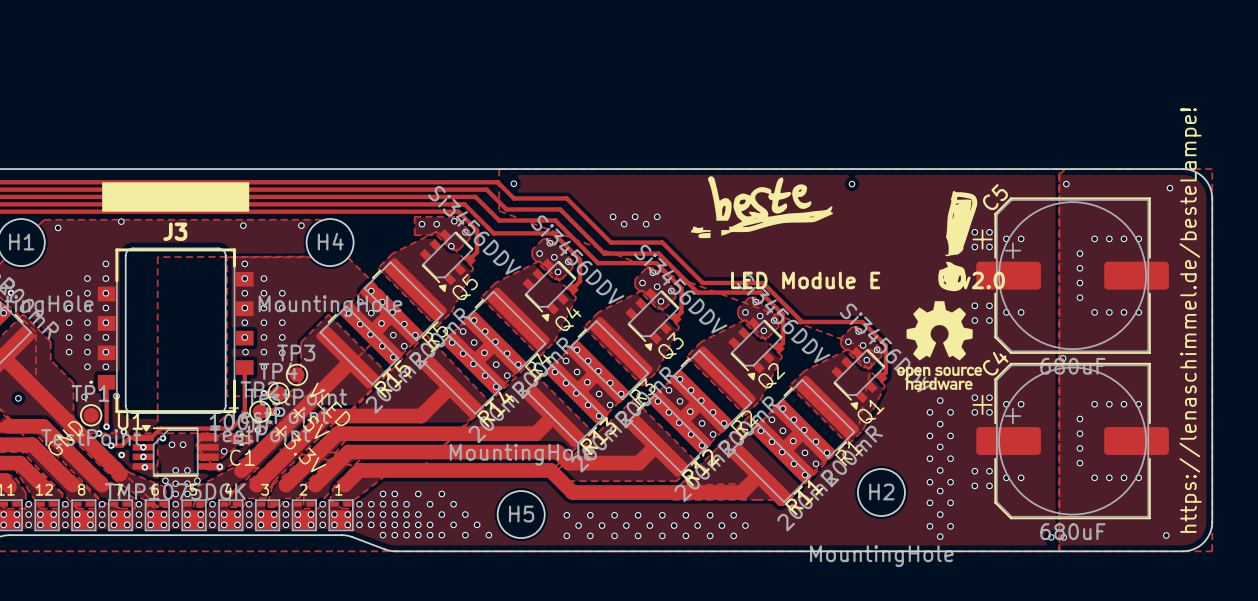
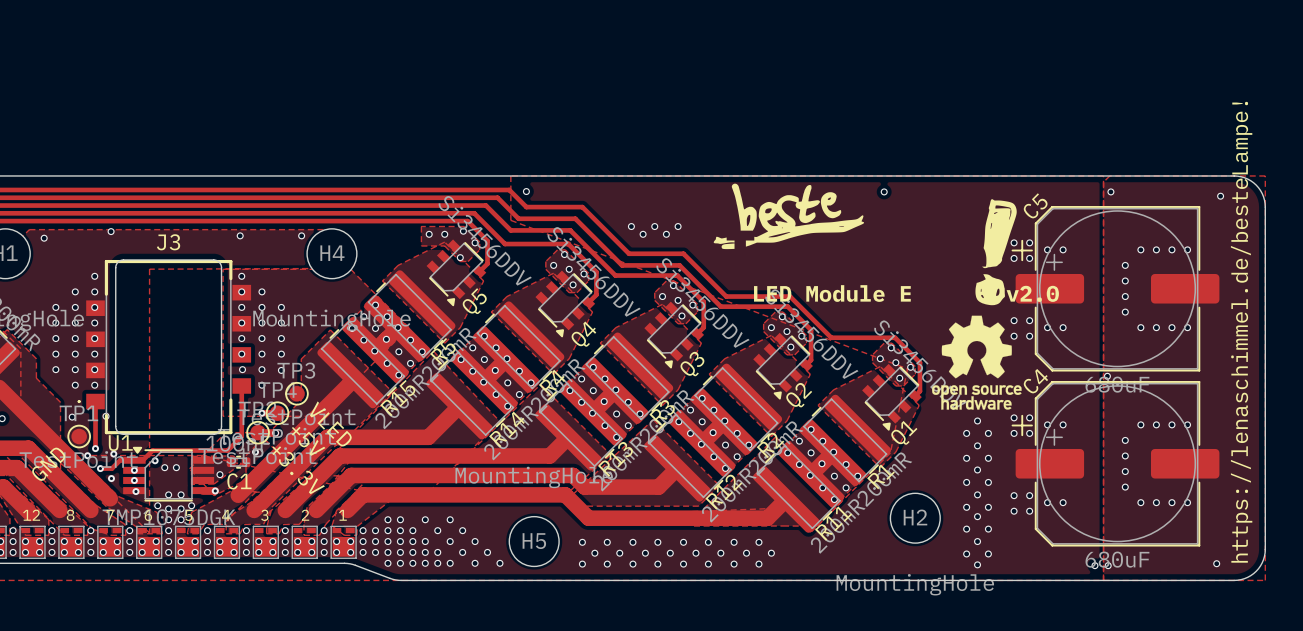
drawing: [102, 182, 250, 212] -> none

